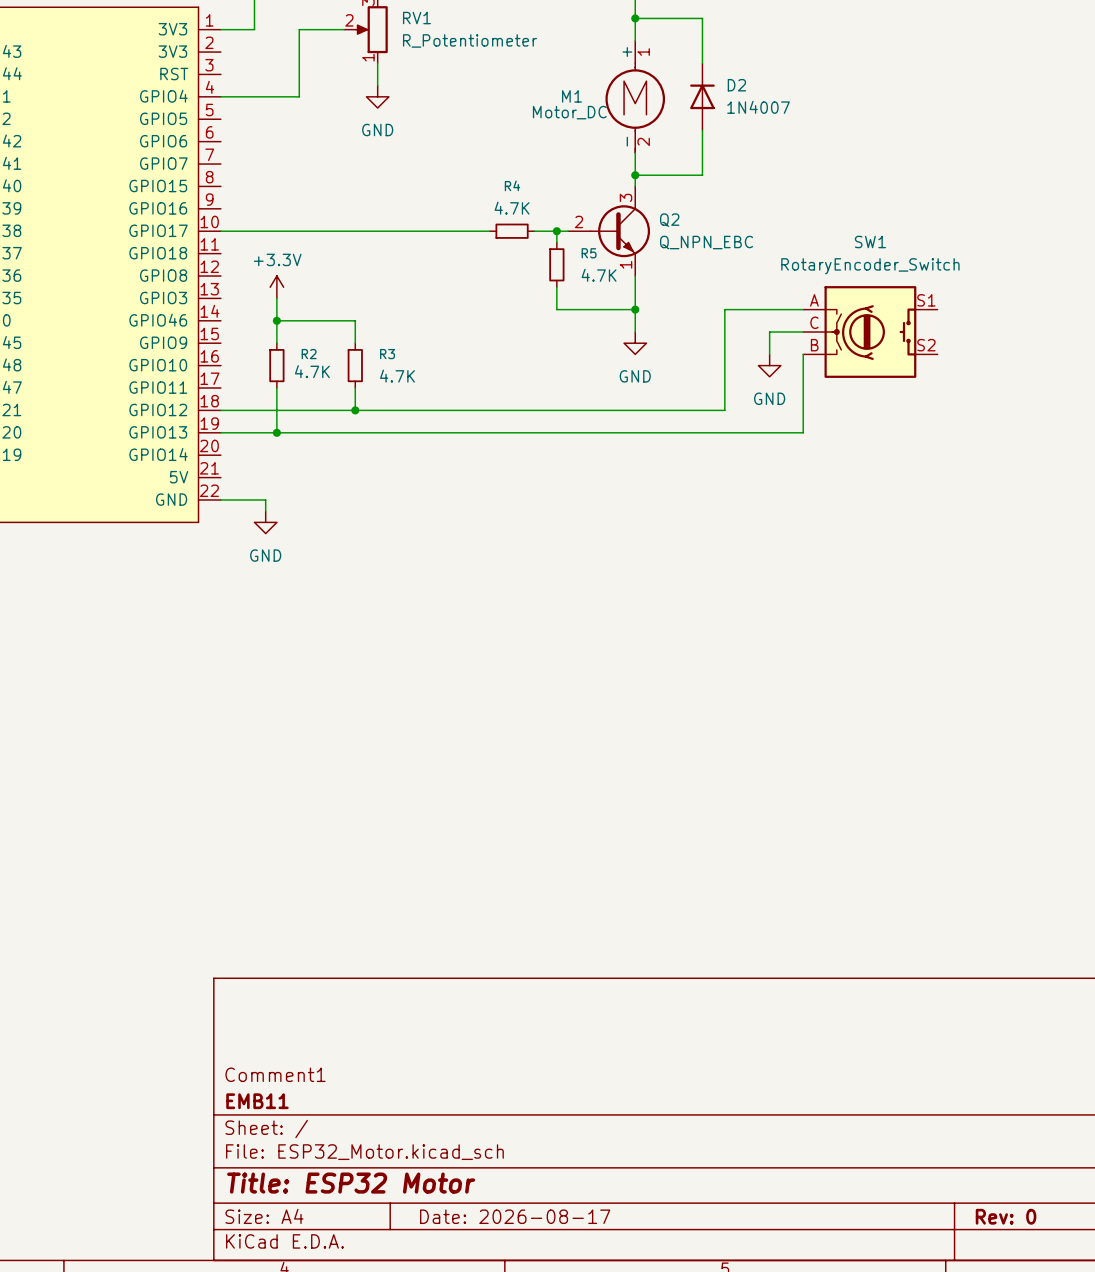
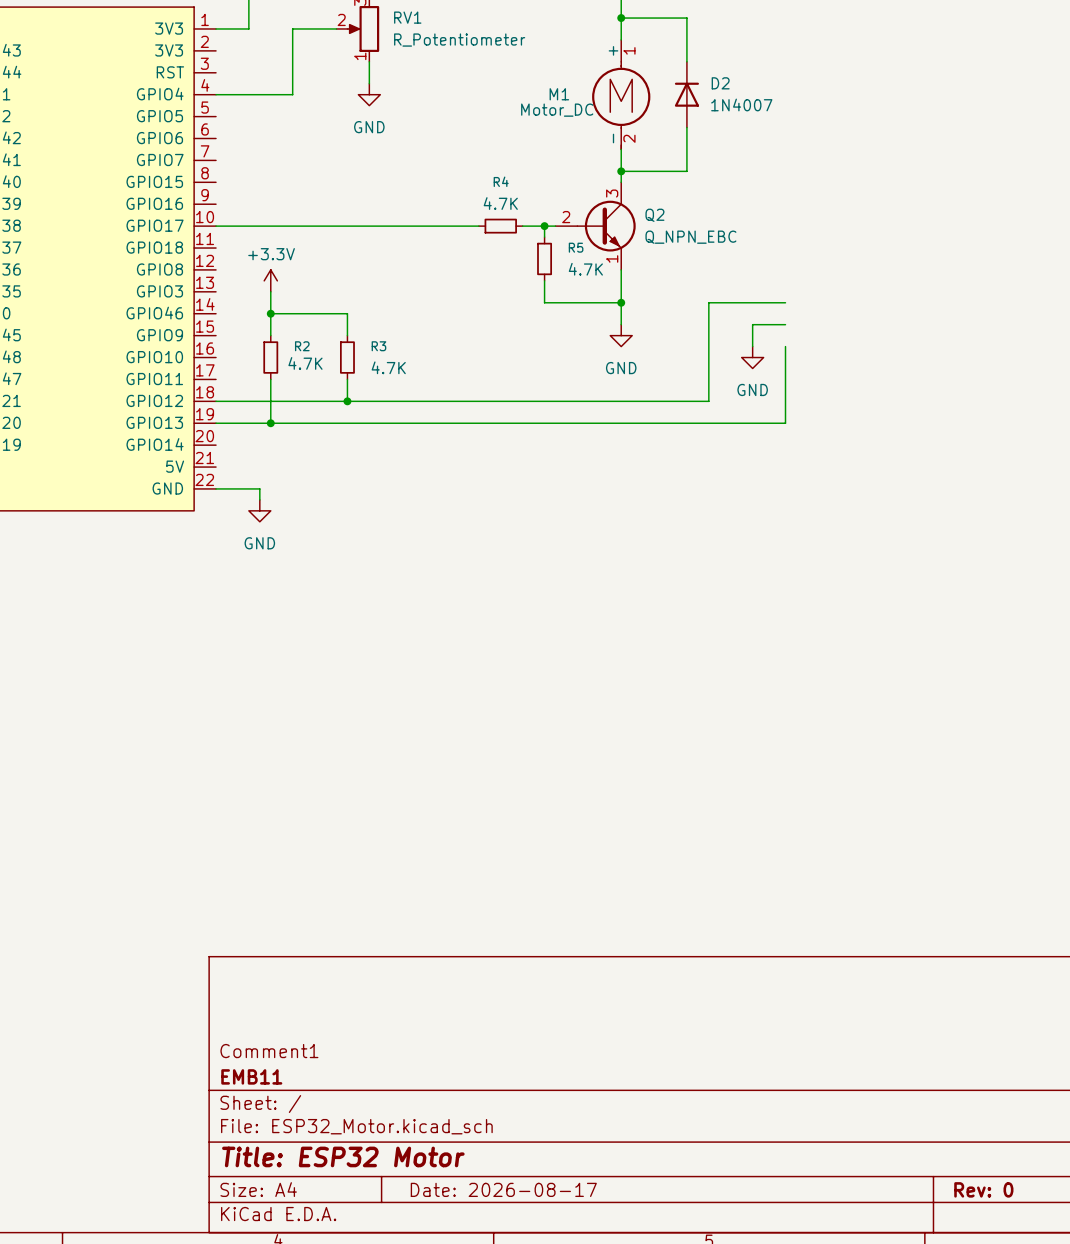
SW1: RotaryEncoder_Switch (870, 332) -> none

